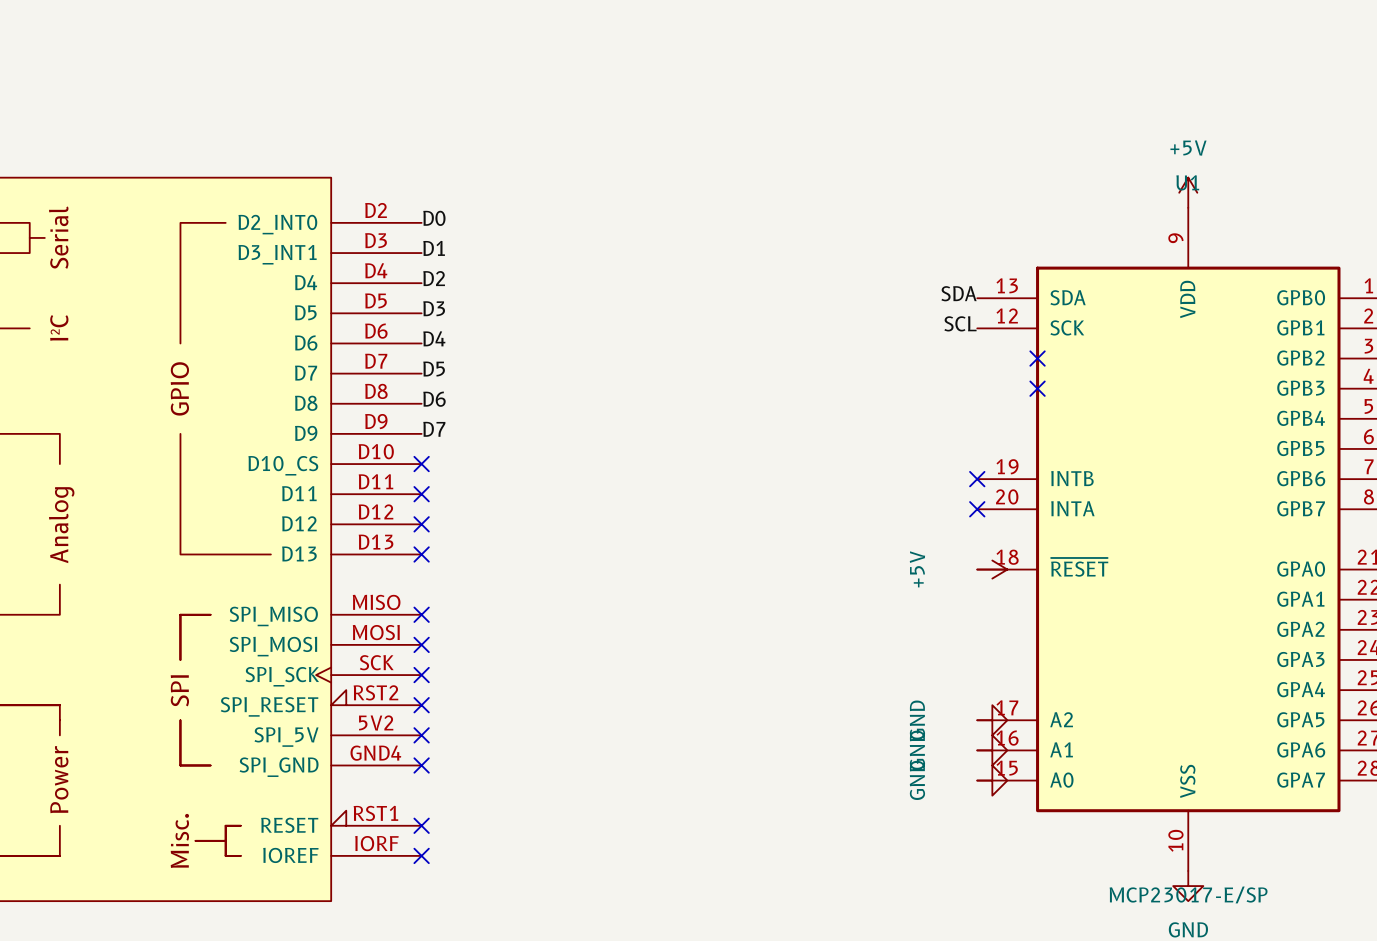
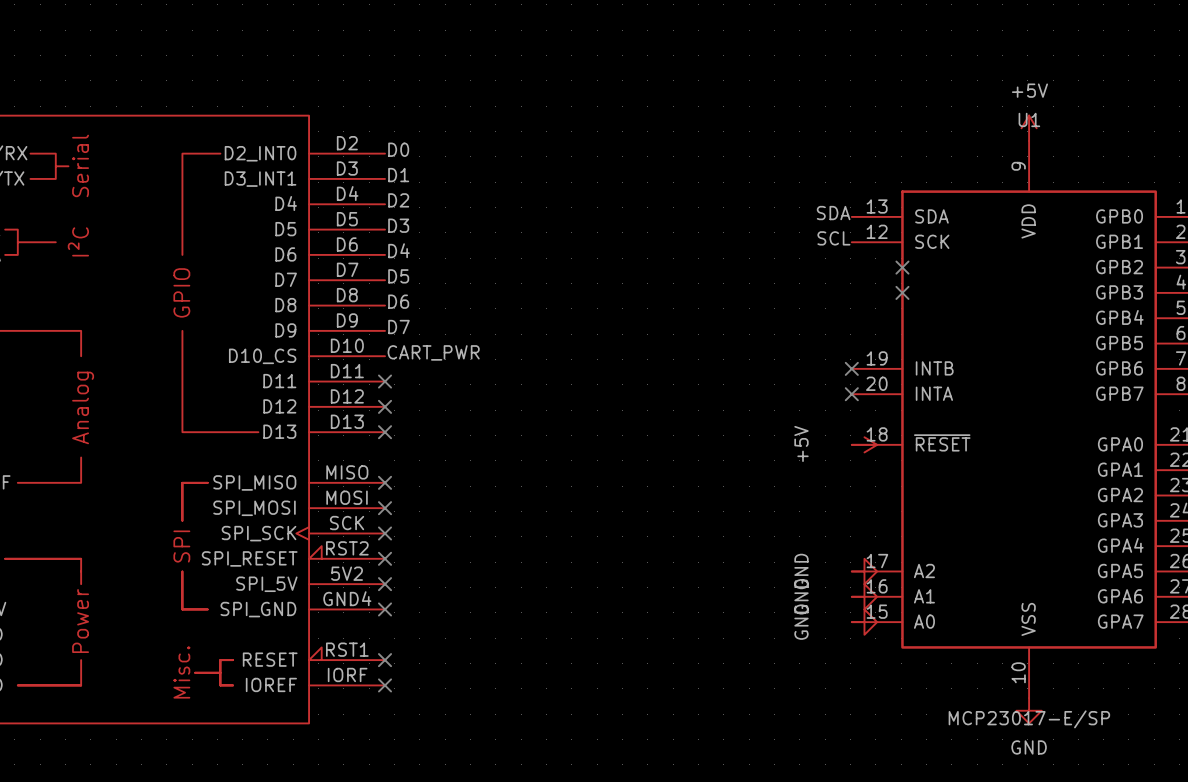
label: none -> CART_PWR (433, 352)
no-connect mark: (421, 464) -> none

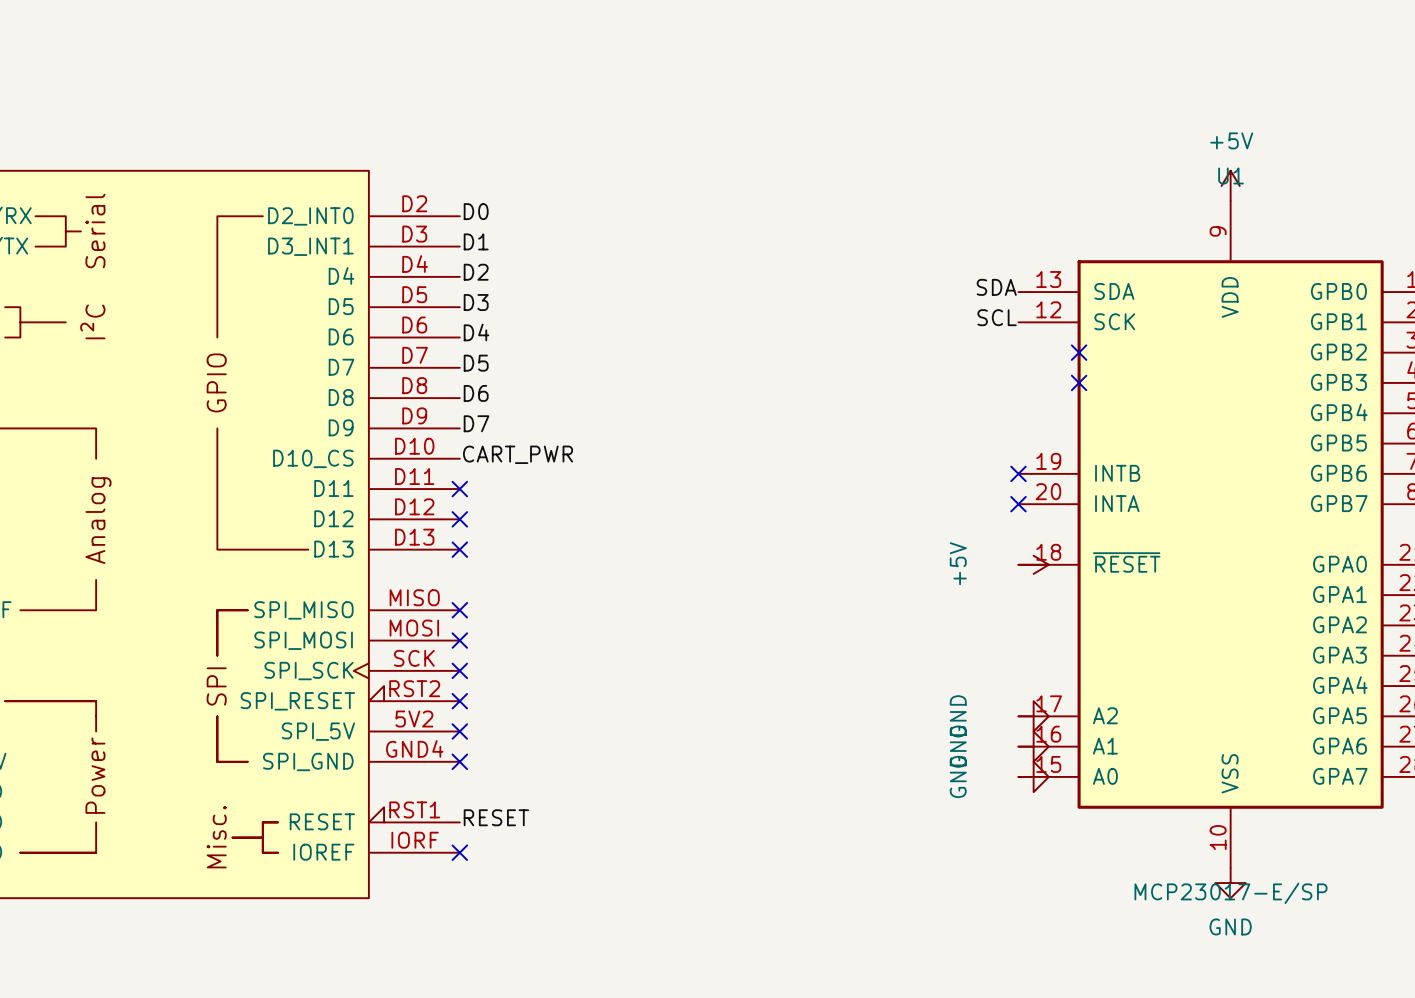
label: none -> RESET (496, 817)
no-connect mark: (385, 660) -> none

